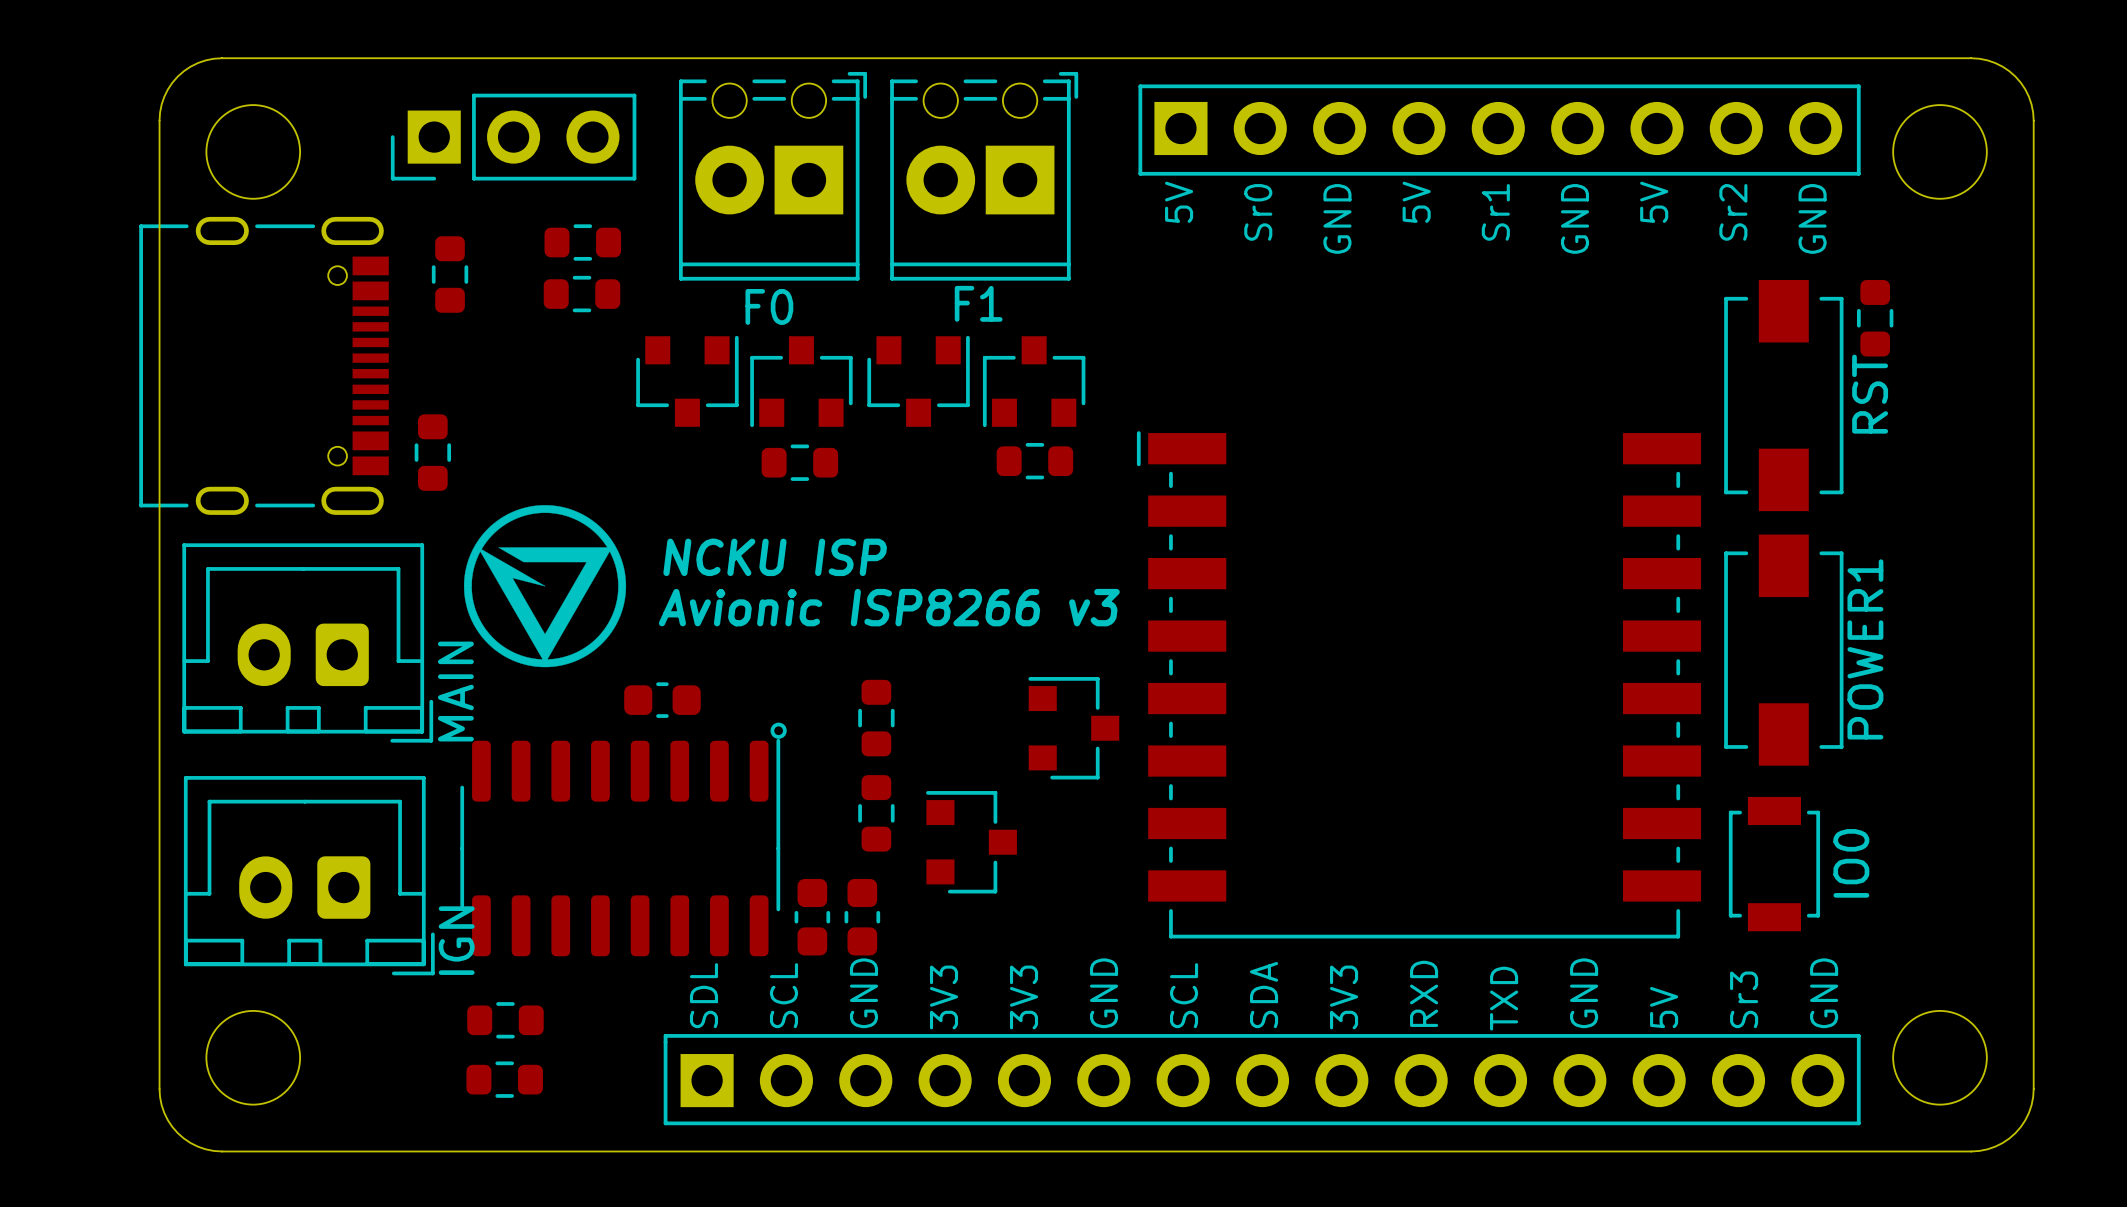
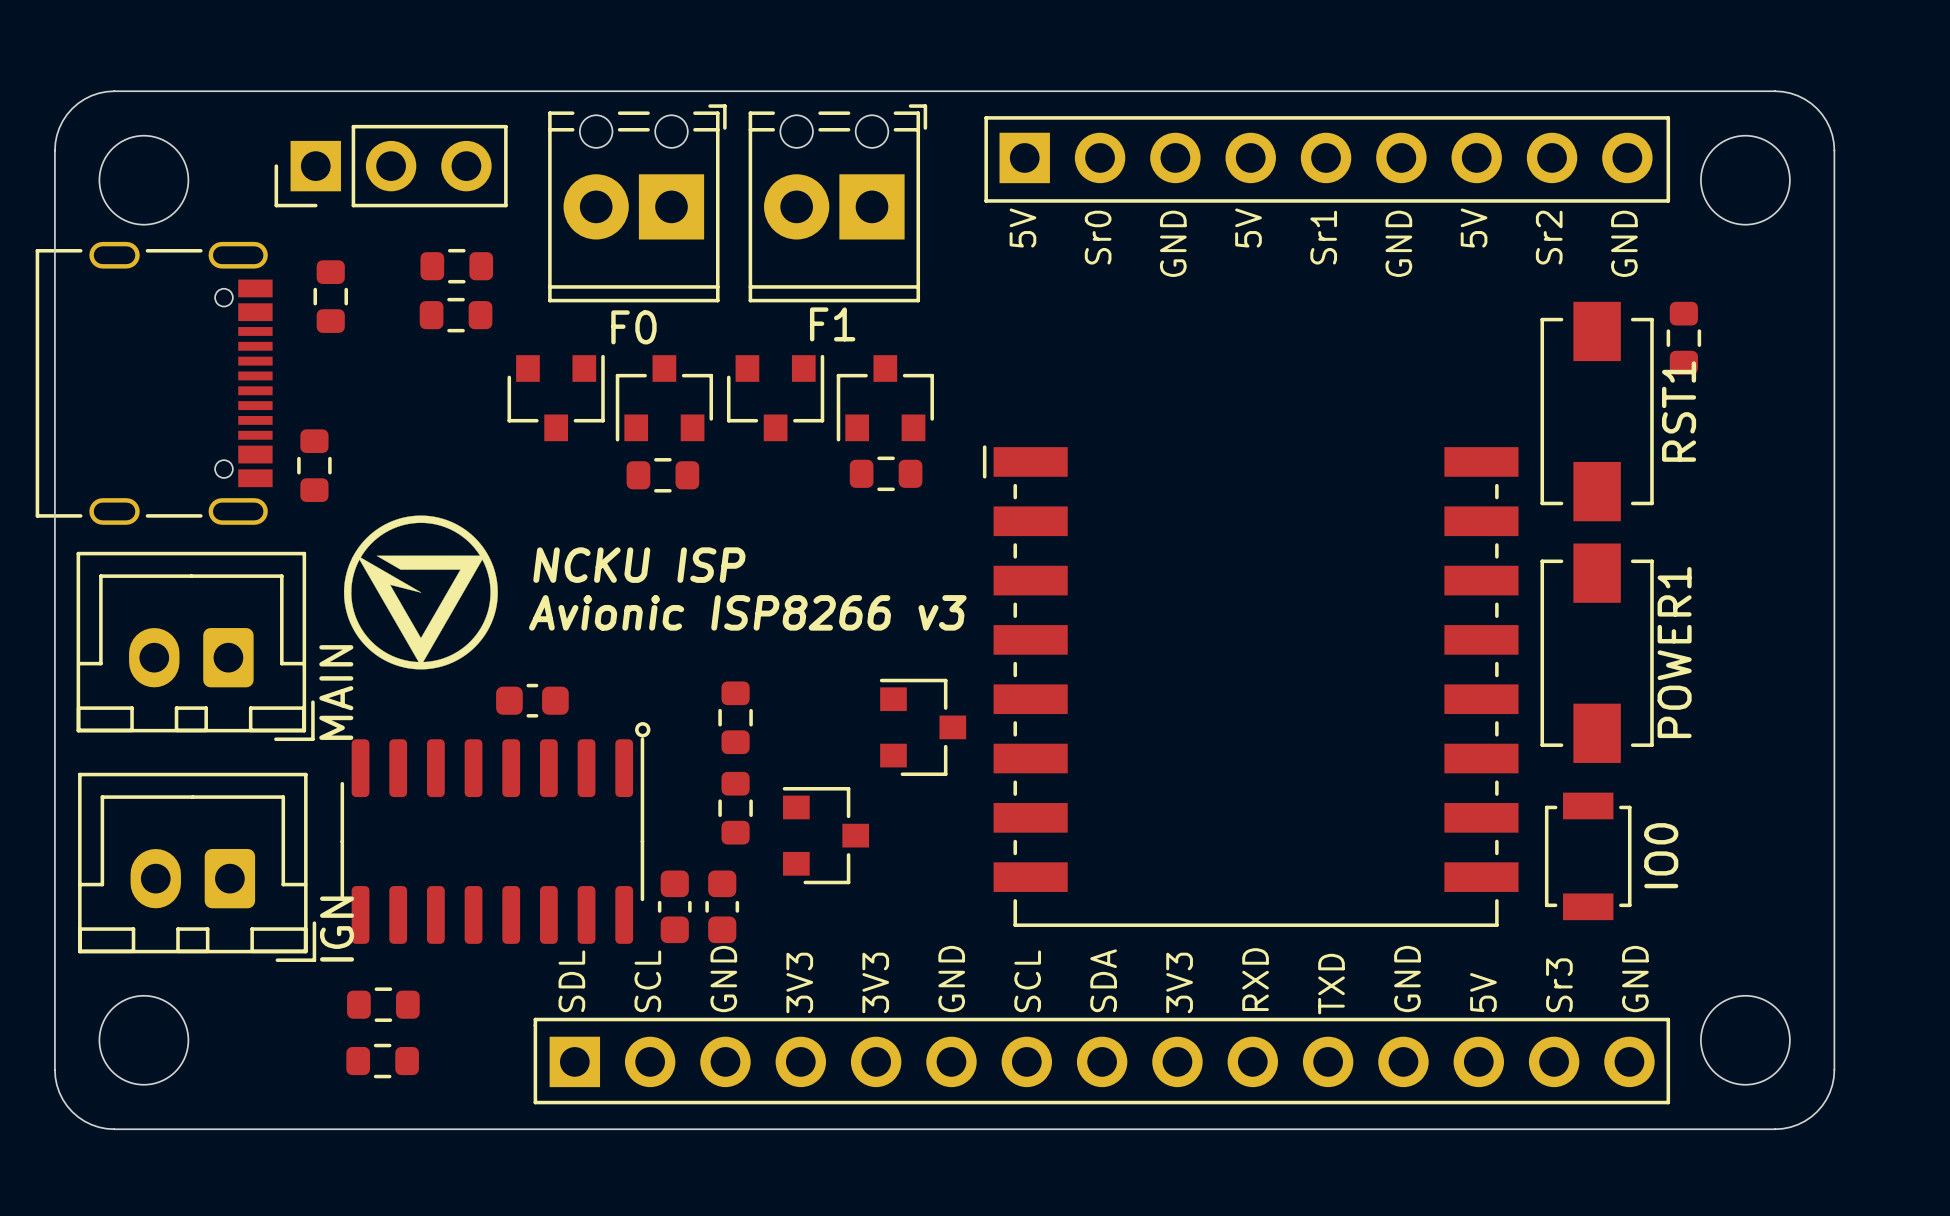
RST name: RST (1870, 394) -> RST1 (1679, 411)

